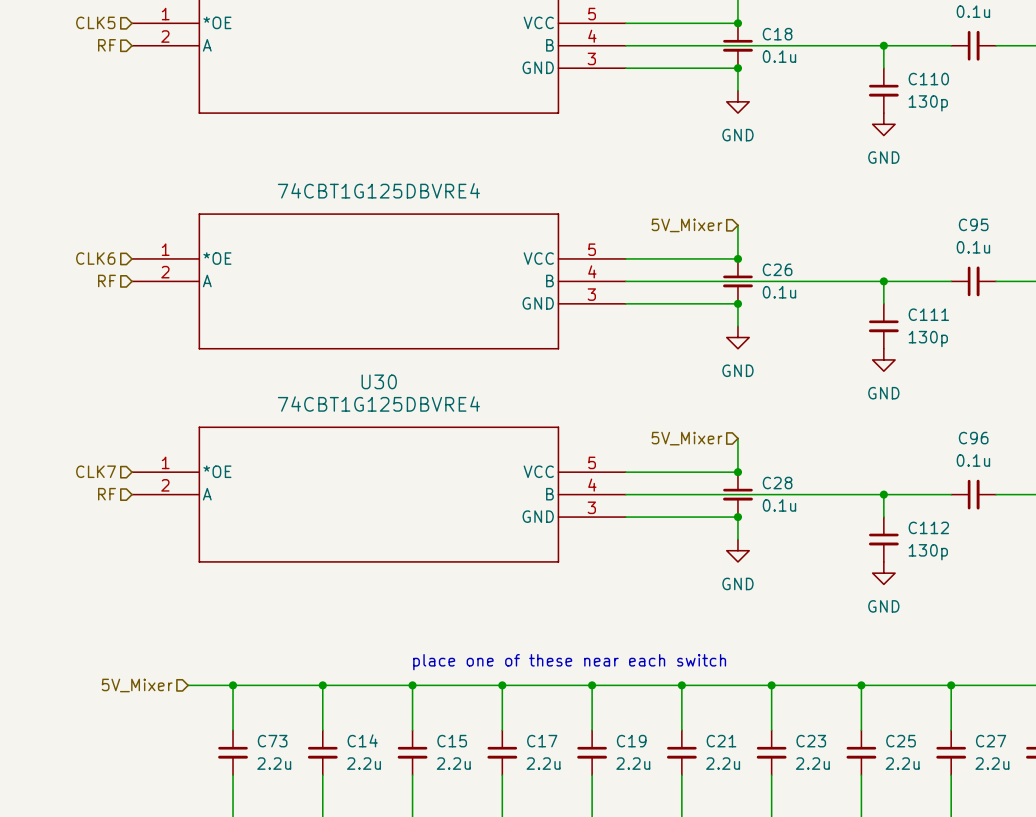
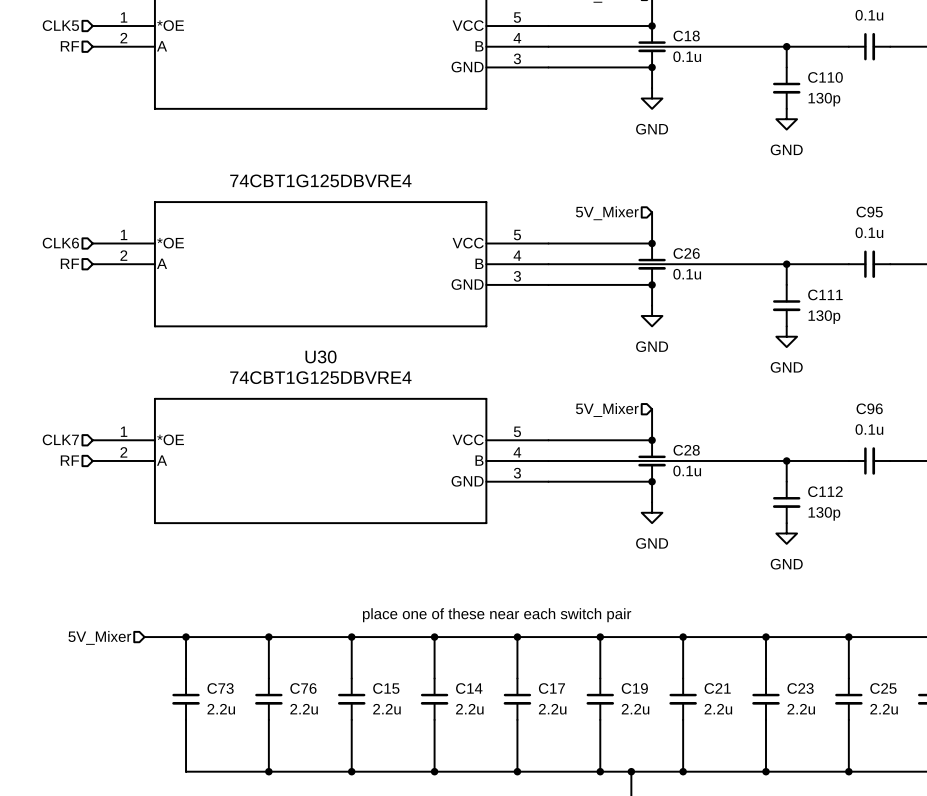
text: place one of these near each switch (569, 662) -> place one of these near each switch pair (497, 615)
C14 name: C14 (362, 740) -> C76 (303, 688)
C17 name: C17 (542, 741) -> C14 (469, 688)
C19 name: C19 (631, 741) -> C17 (551, 688)
C21 name: C21 (721, 741) -> C19 (634, 688)
C23 name: C23 (811, 741) -> C21 (717, 688)
C25 name: C25 (901, 741) -> C23 (800, 688)
C27 name: C27 (991, 741) -> C25 (883, 688)

